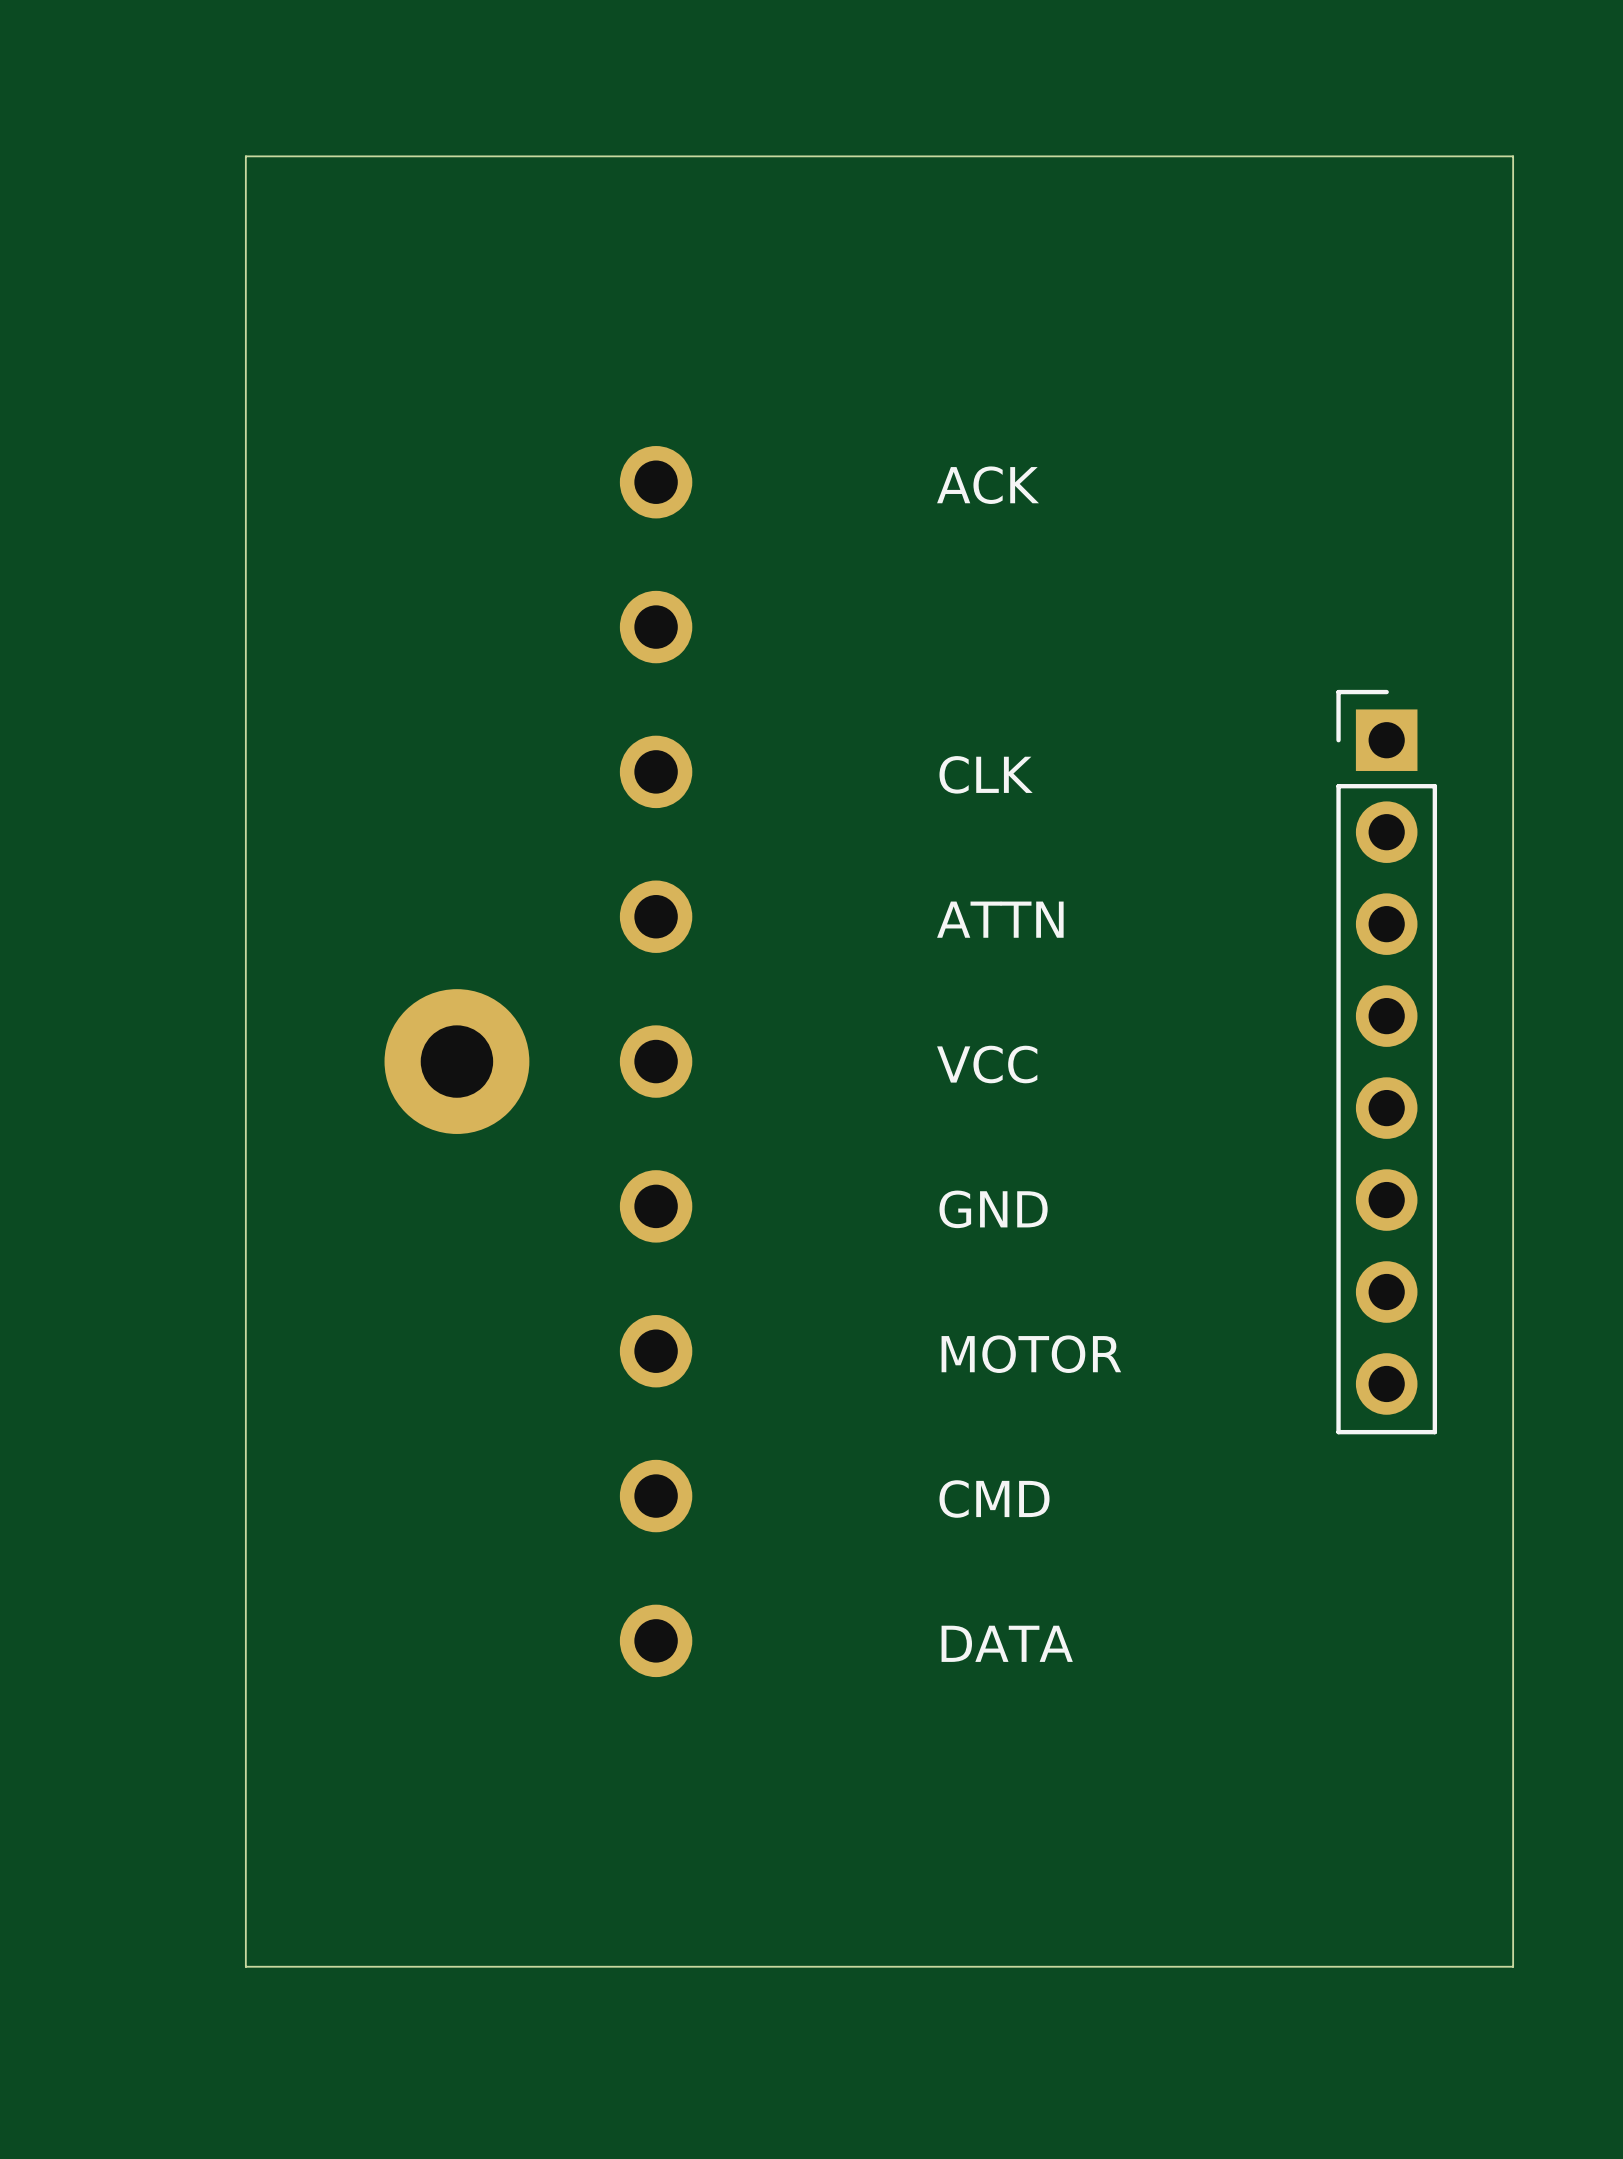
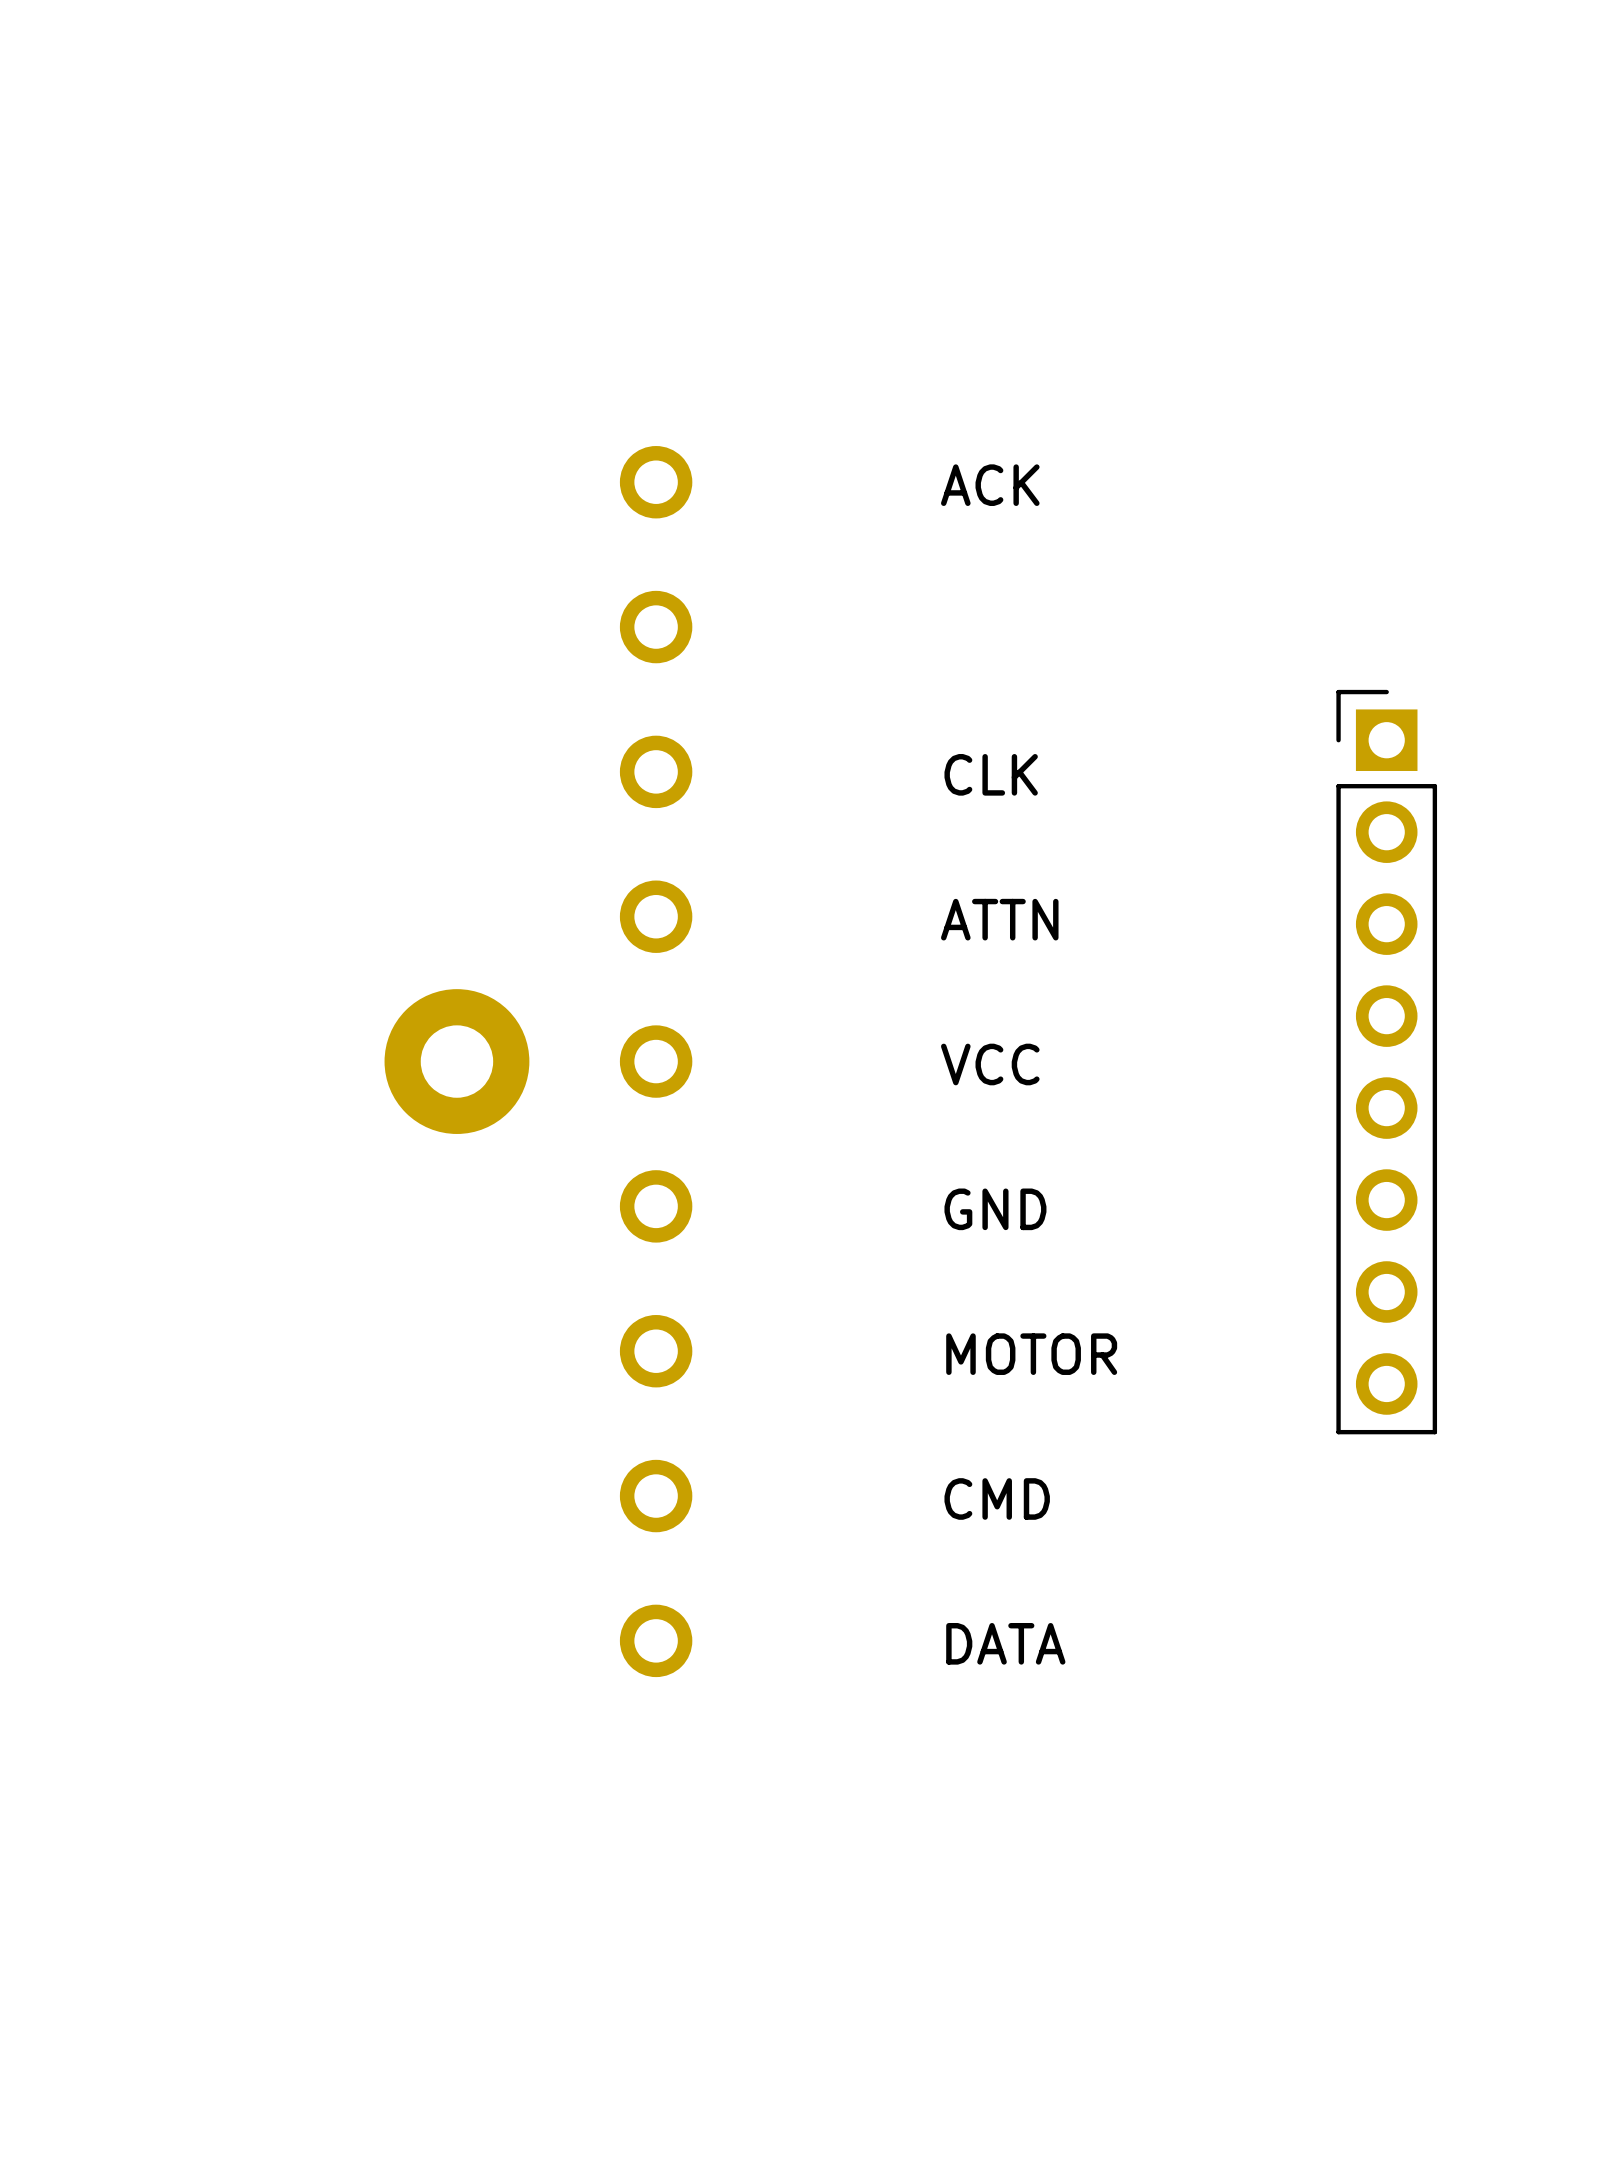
board edge: (245, 156) (1513, 156) (1513, 1966) (245, 1966) (245, 156) -> none

